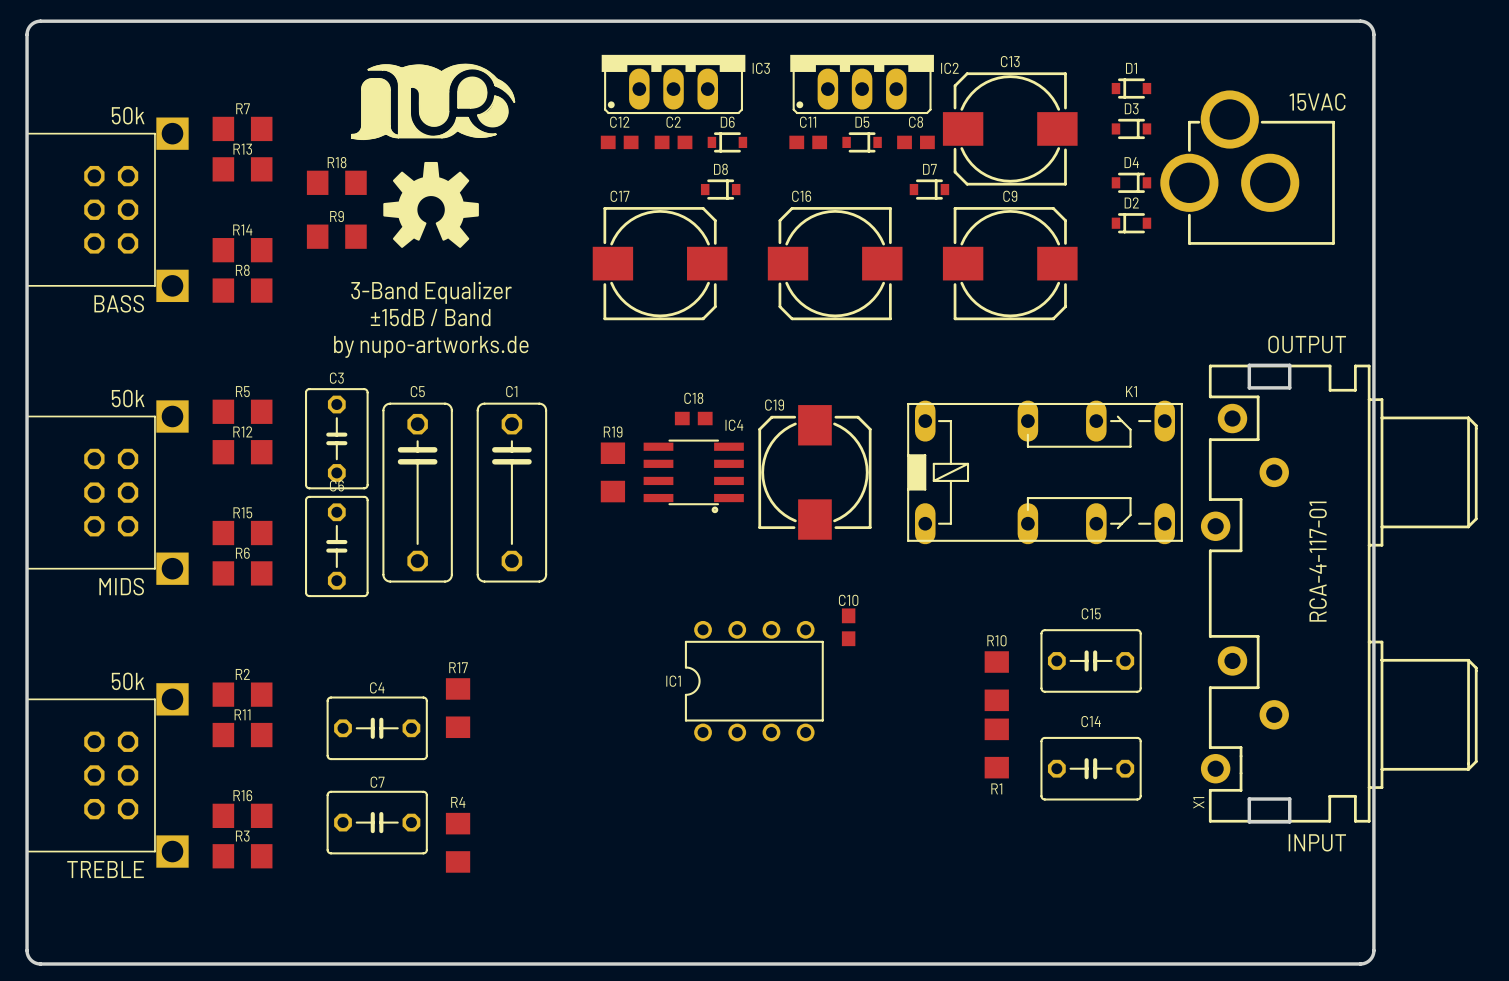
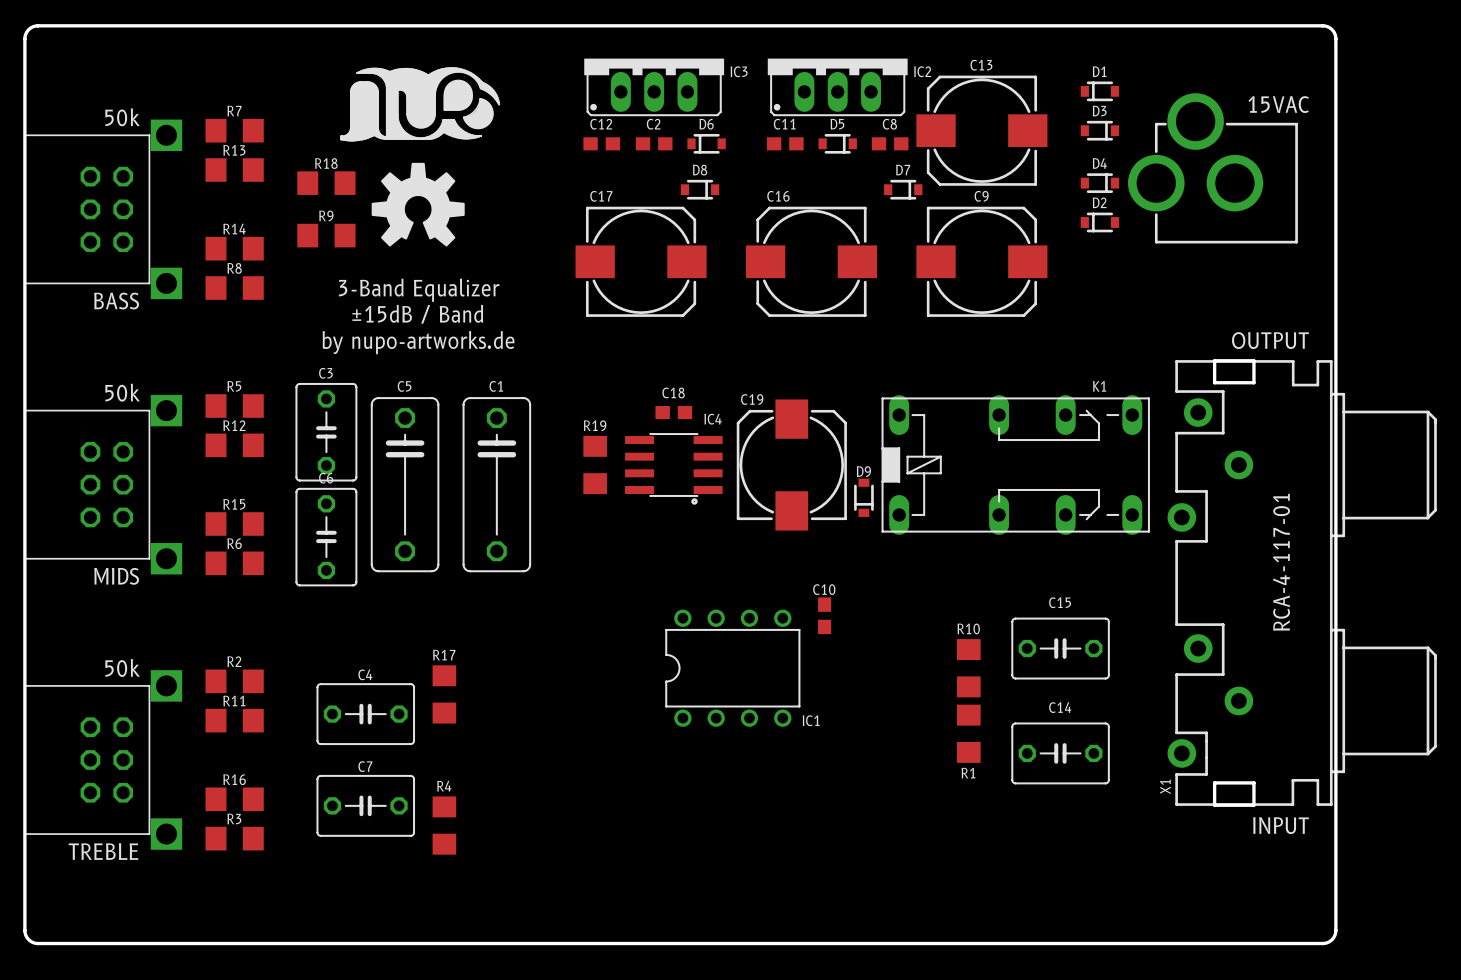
D9: none -> (863, 497)
IC1 name position: IC1 (673, 681) -> IC1 (811, 720)

